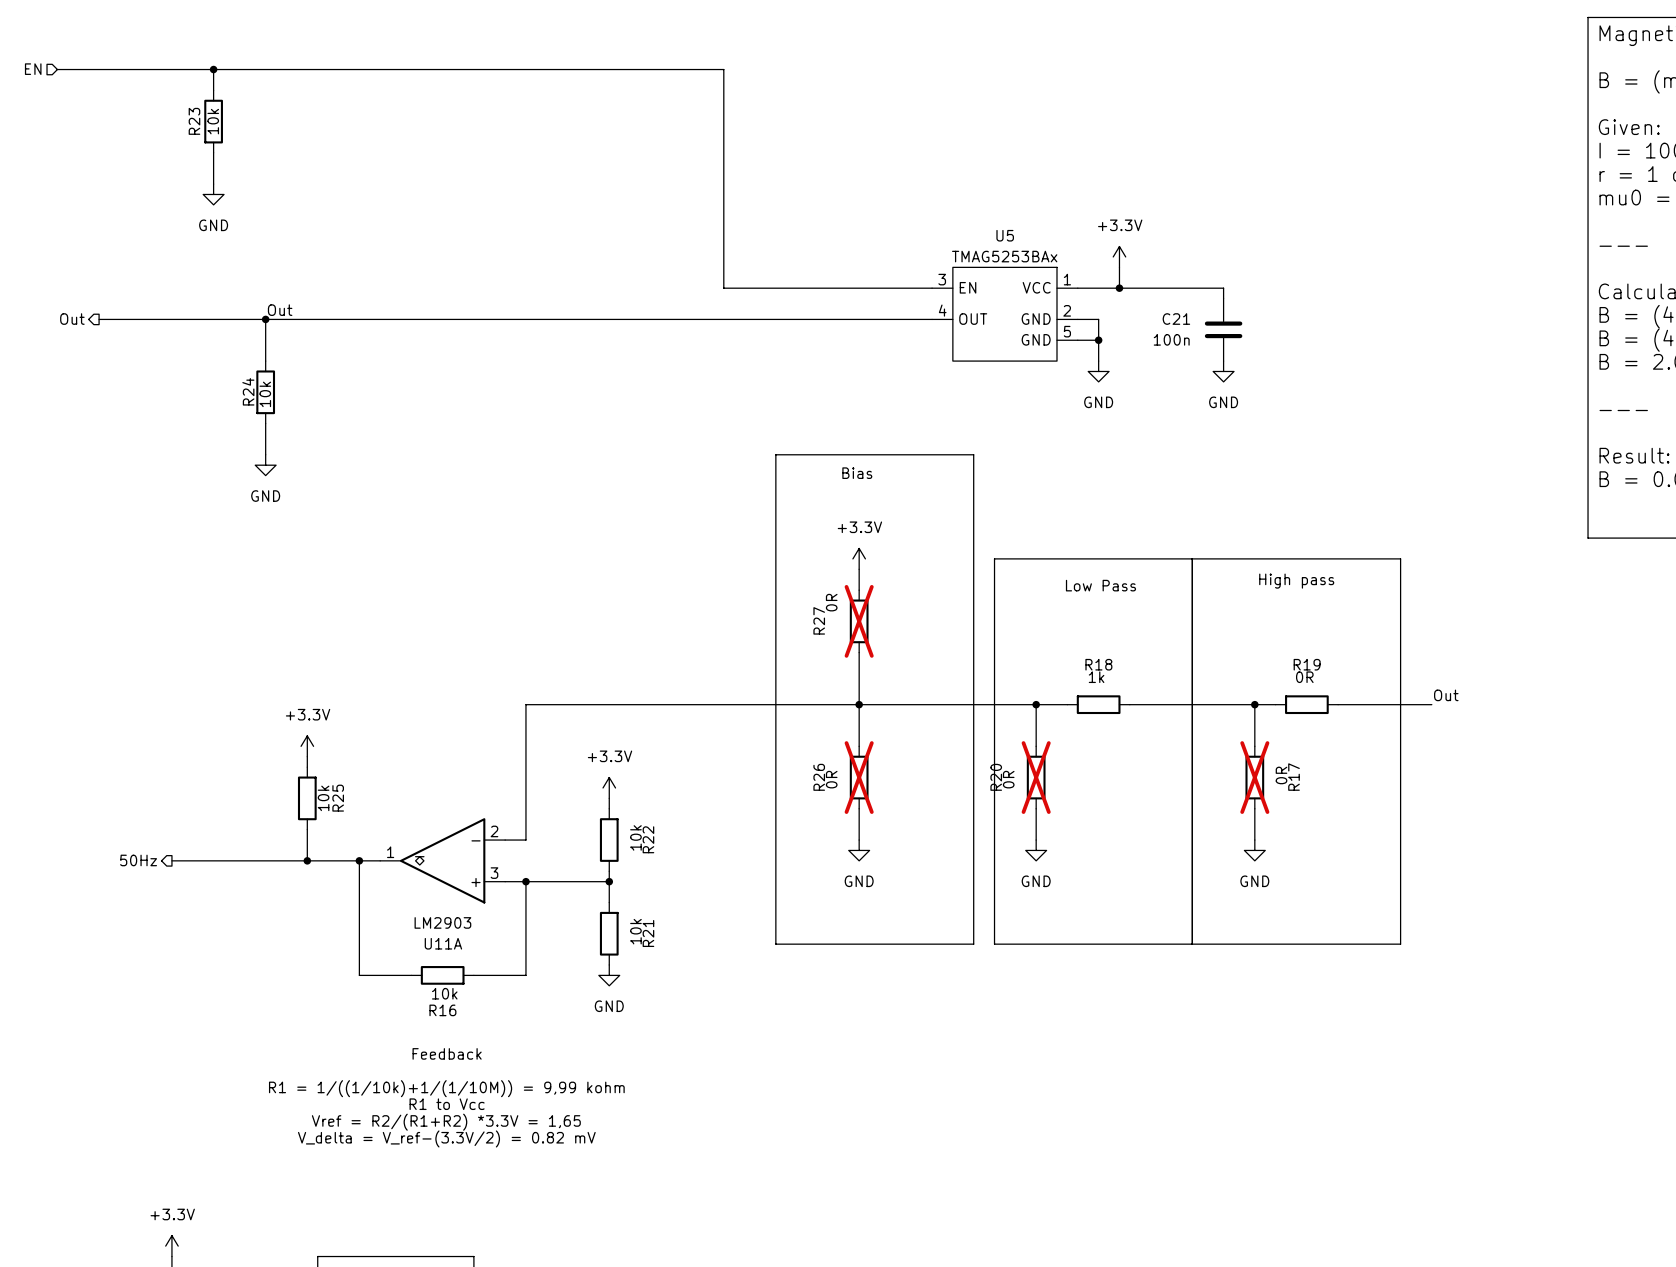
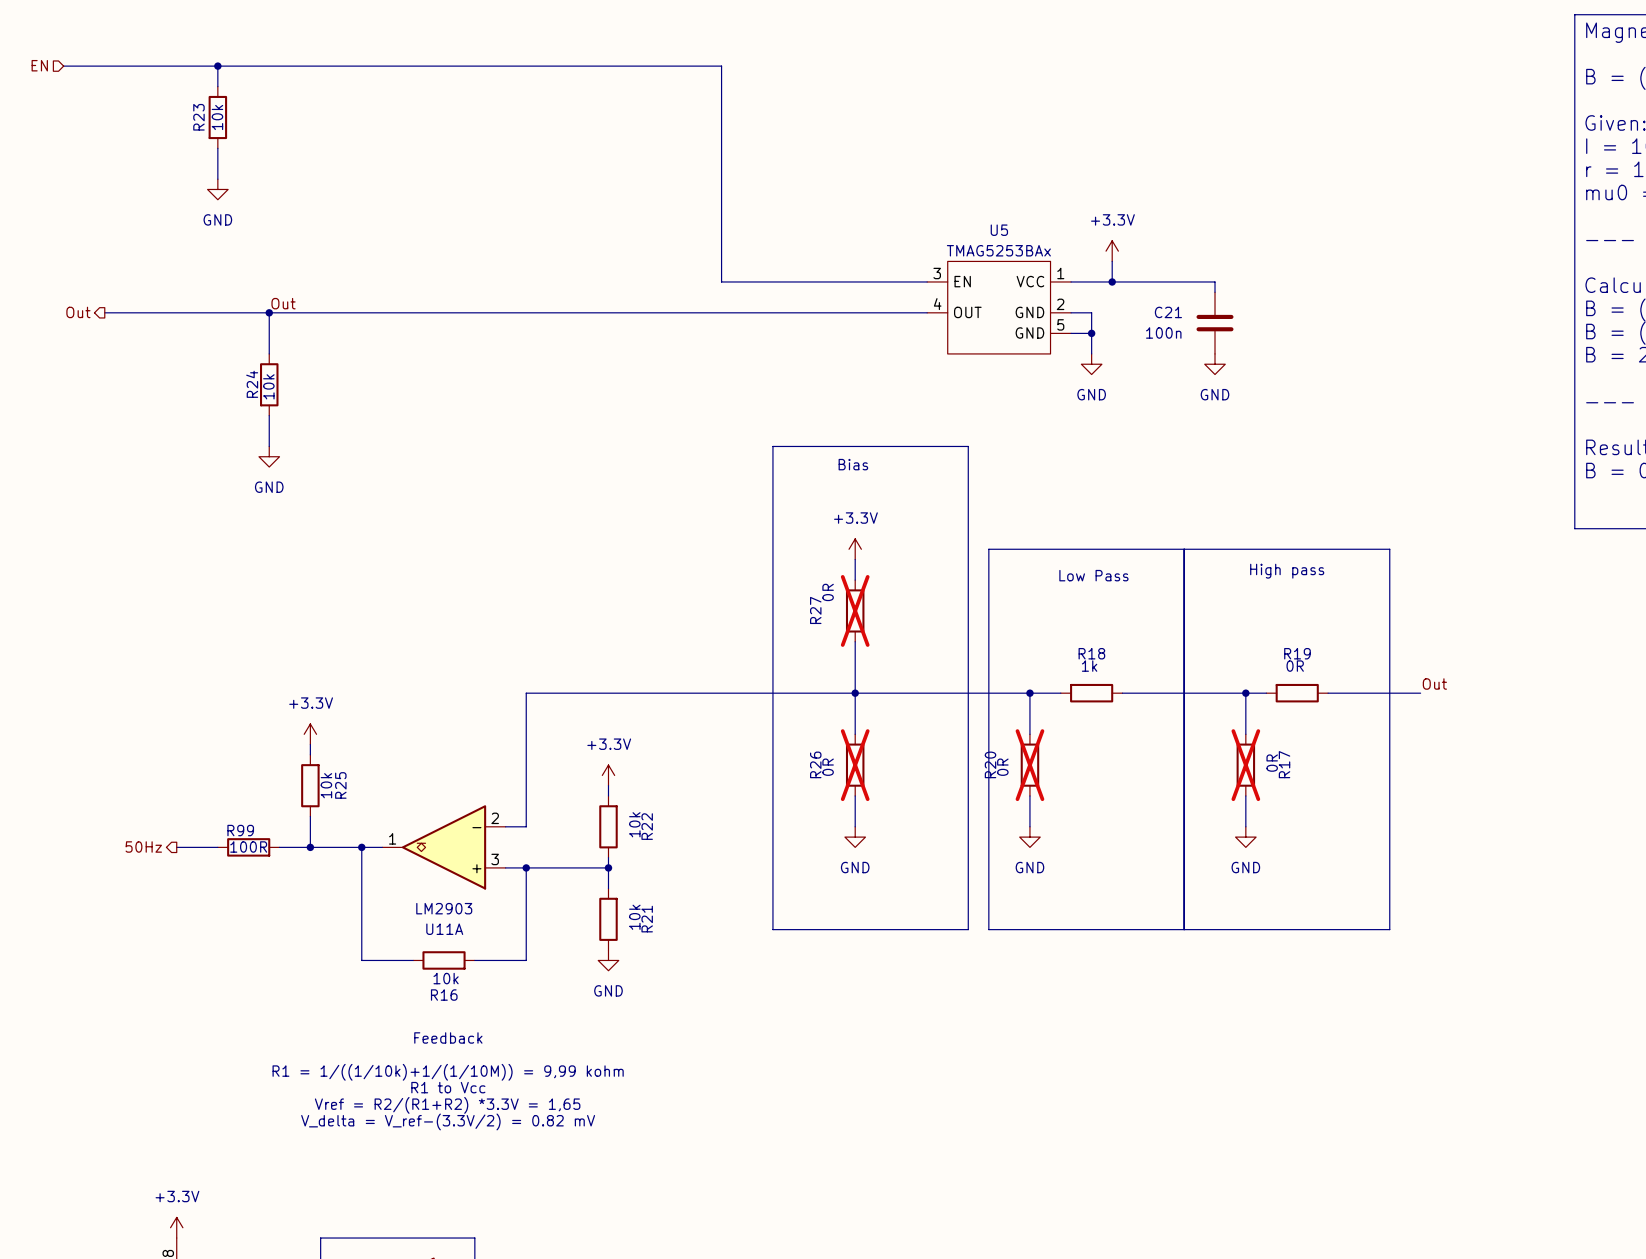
R99: none -> 100R (248, 847)

